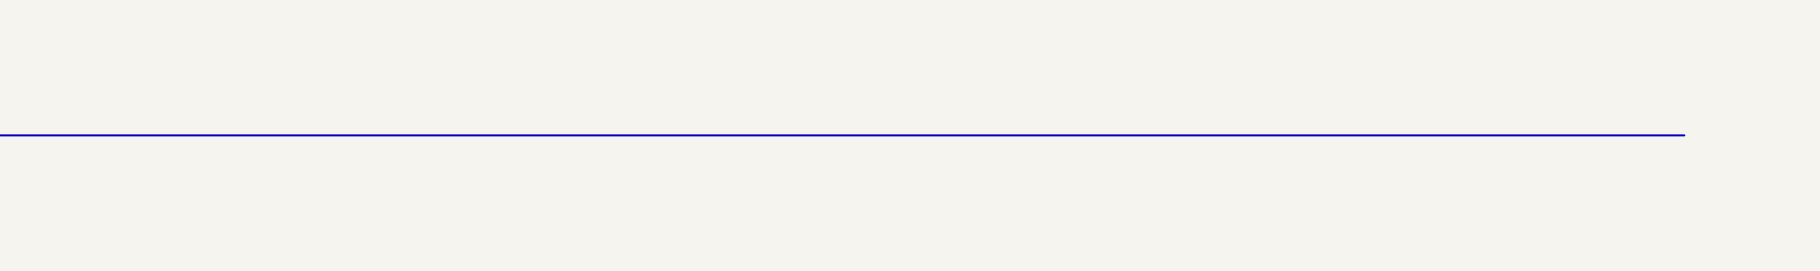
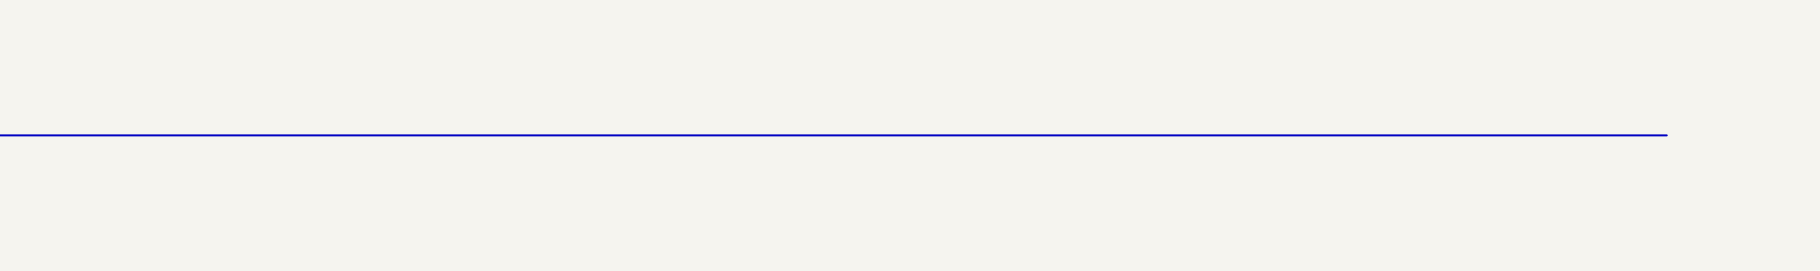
line: (1666, 135) (1684, 135) -> none

